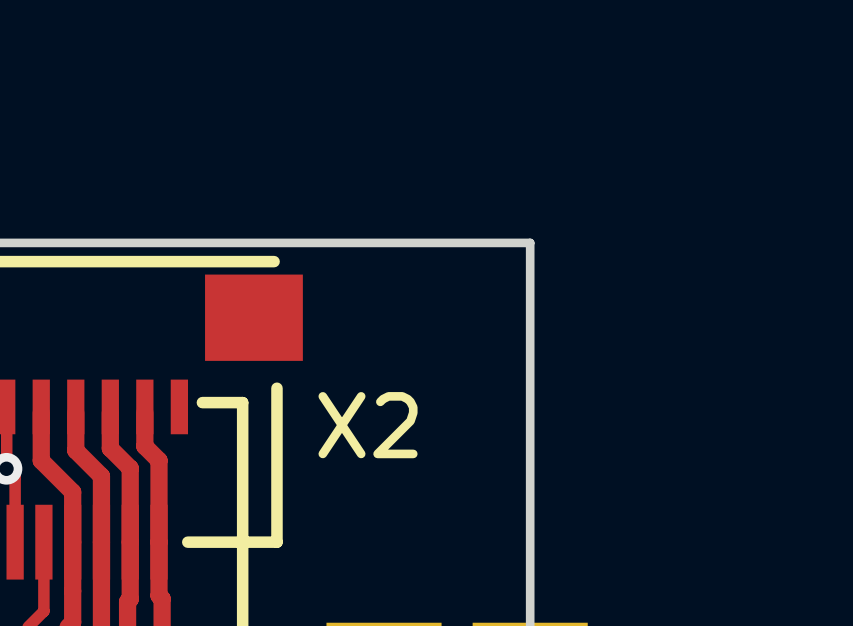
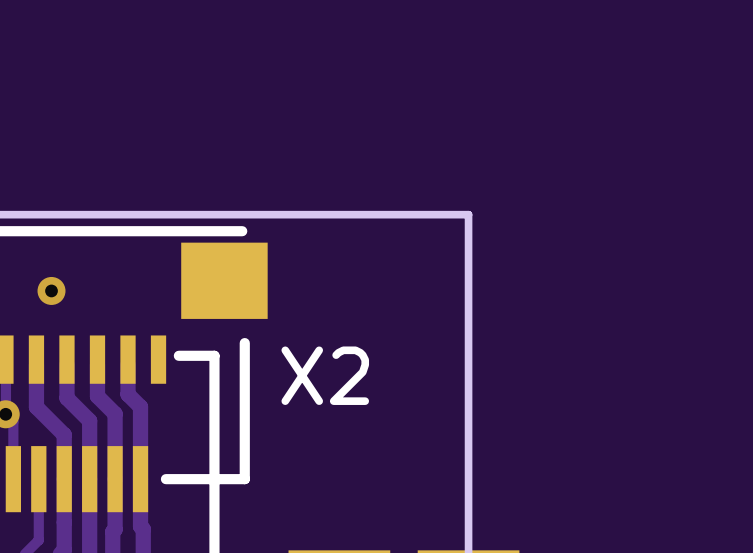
via: none -> (51, 290)

